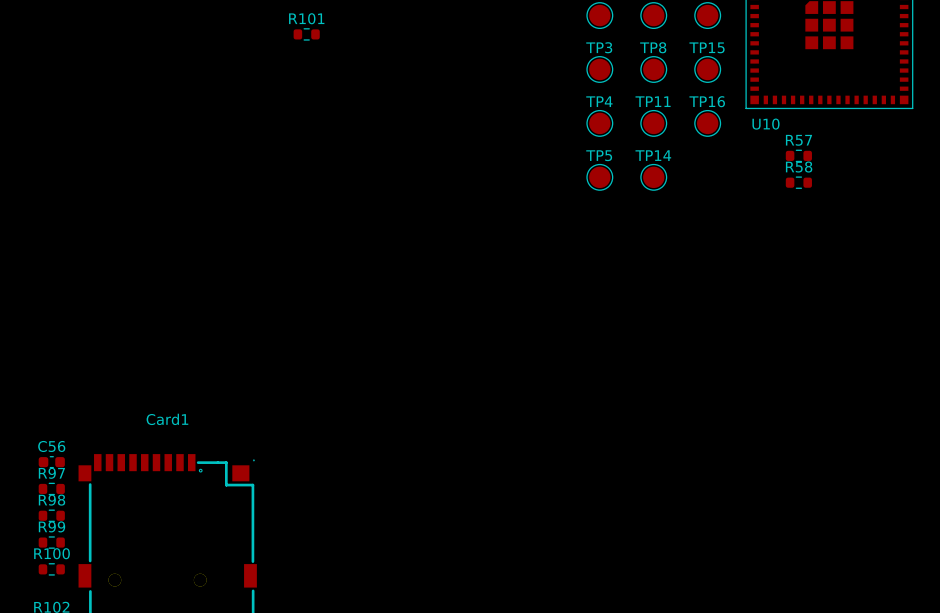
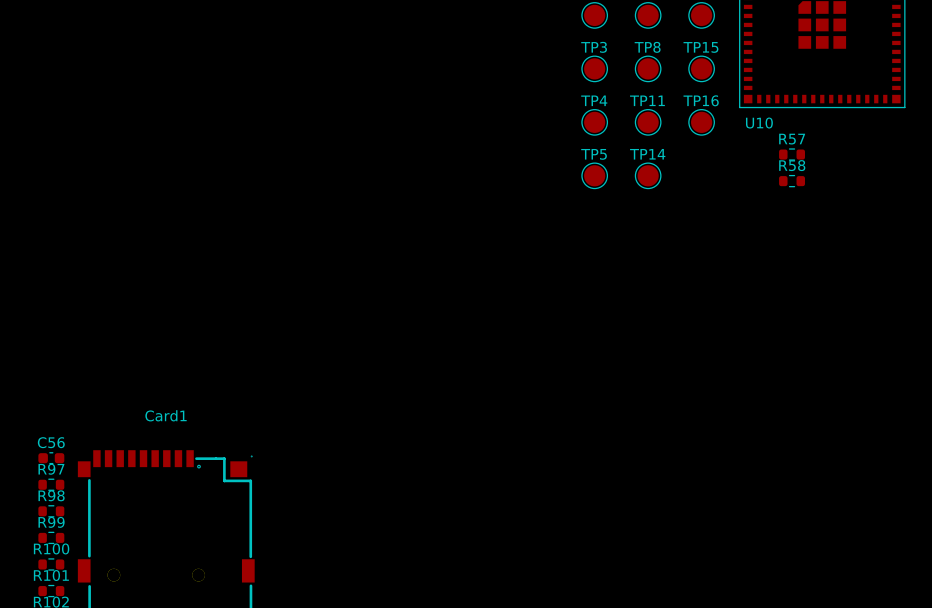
R101 position: (306, 34) -> (51, 591)

